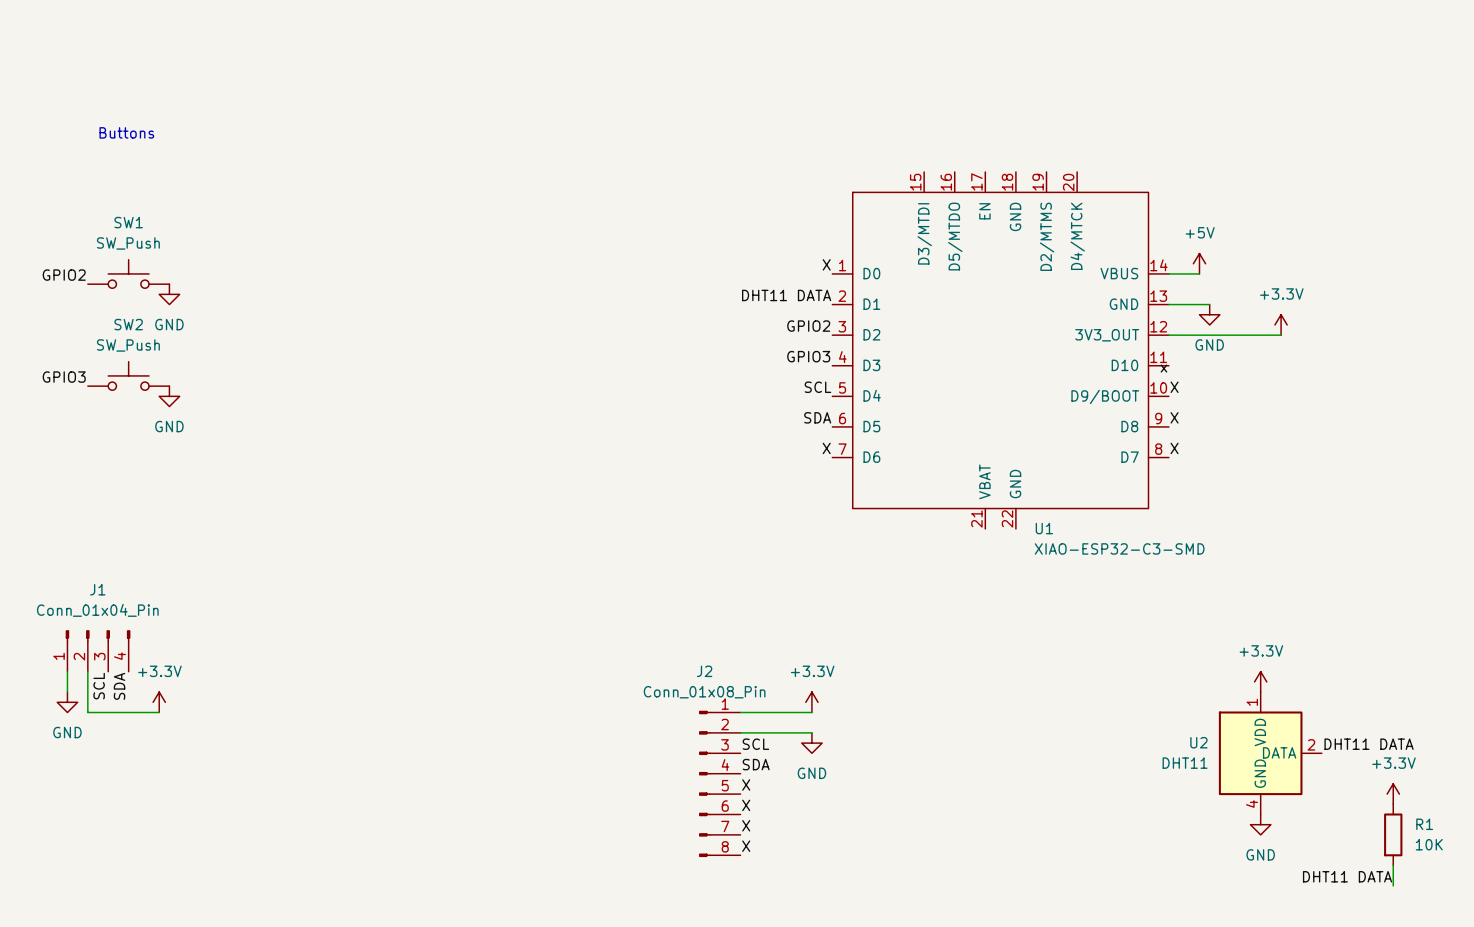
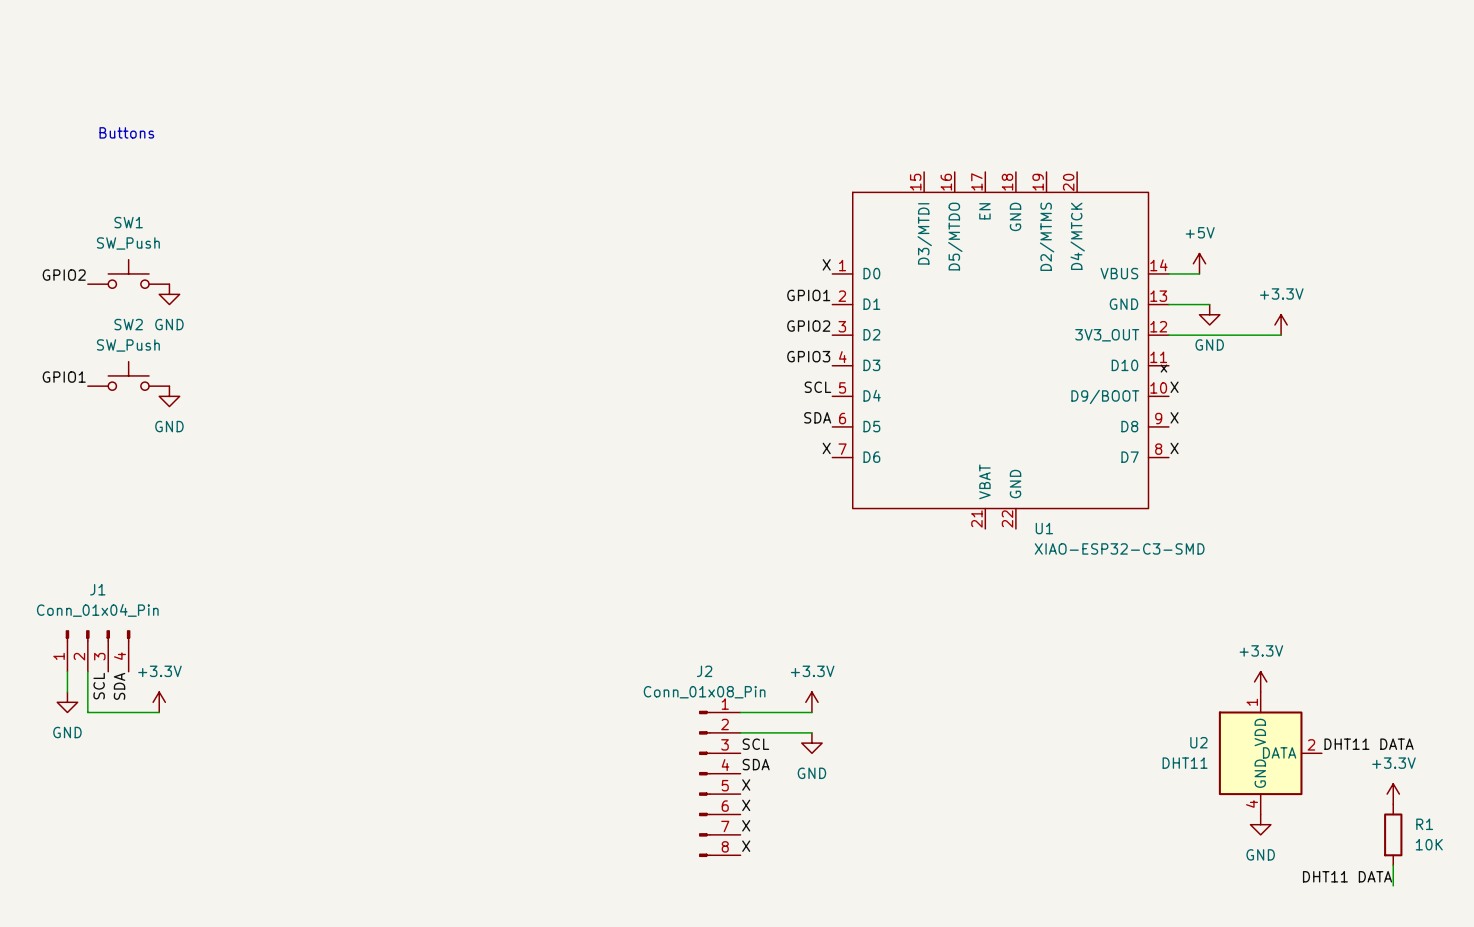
label: DHT11 DATA (786, 295) -> GPIO1 (808, 295)
label: GPIO3 (64, 377) -> GPIO1 (64, 377)

